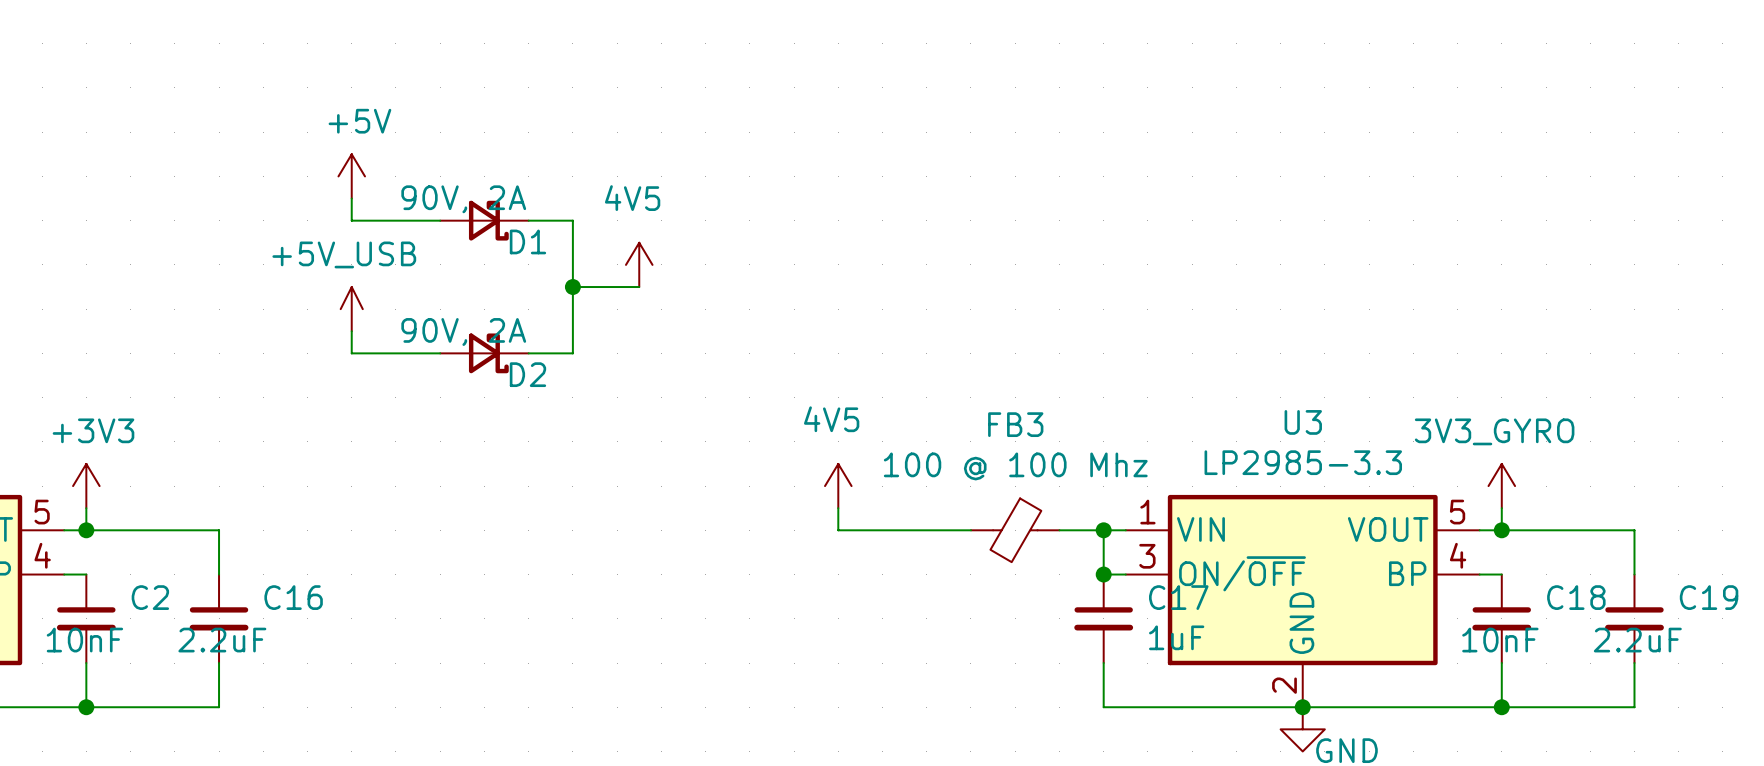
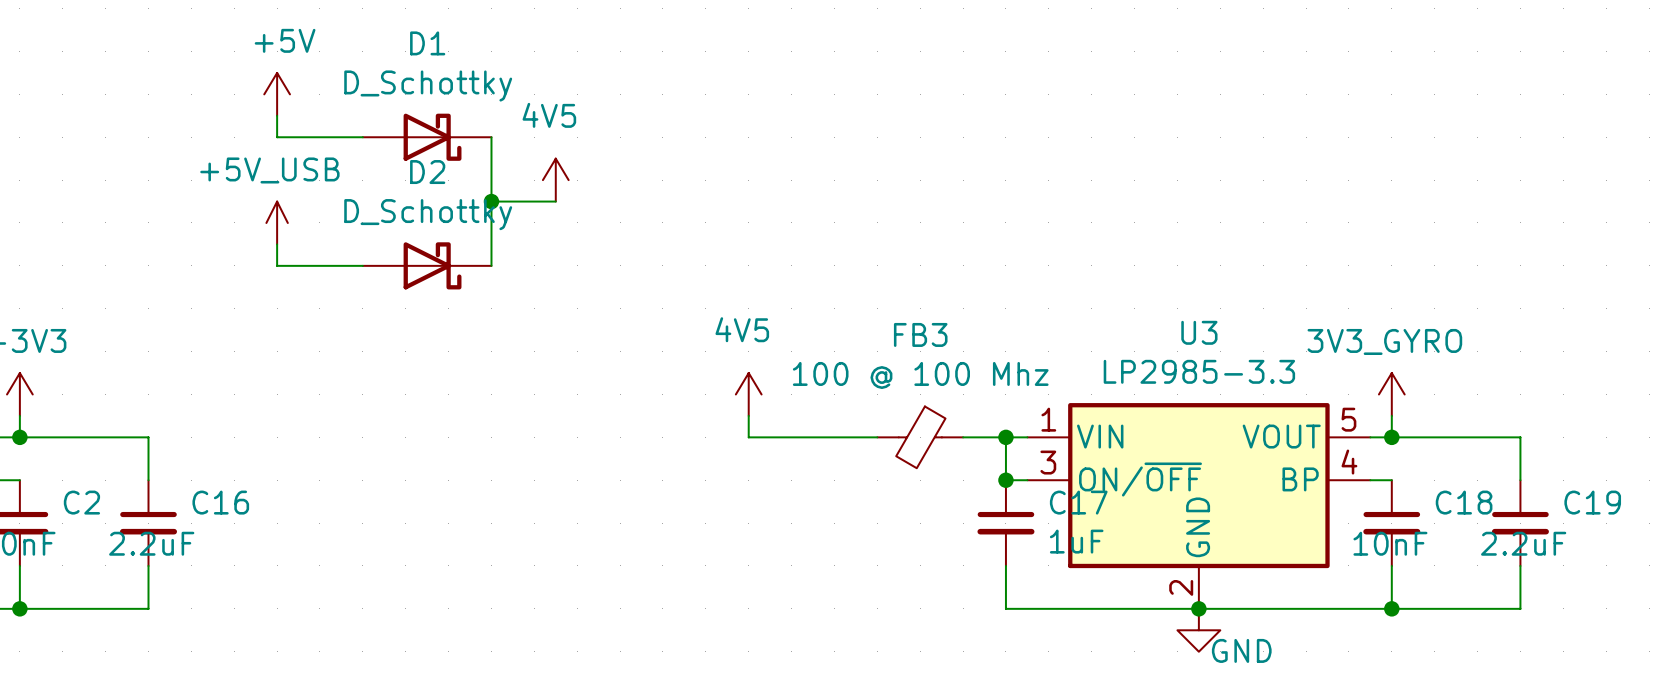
D1 value: 90V, 2A (463, 199) -> D_Schottky (428, 86)
D1 symbol: [440, 200, 529, 241] -> [362, 113, 492, 161]
D1 name position: D1 (527, 241) -> D1 (427, 43)
D2 value: 90V, 2A (463, 332) -> D_Schottky (428, 214)
D2 symbol: [440, 333, 529, 374] -> [362, 242, 492, 290]
D2 name position: D2 (527, 374) -> D2 (427, 172)

